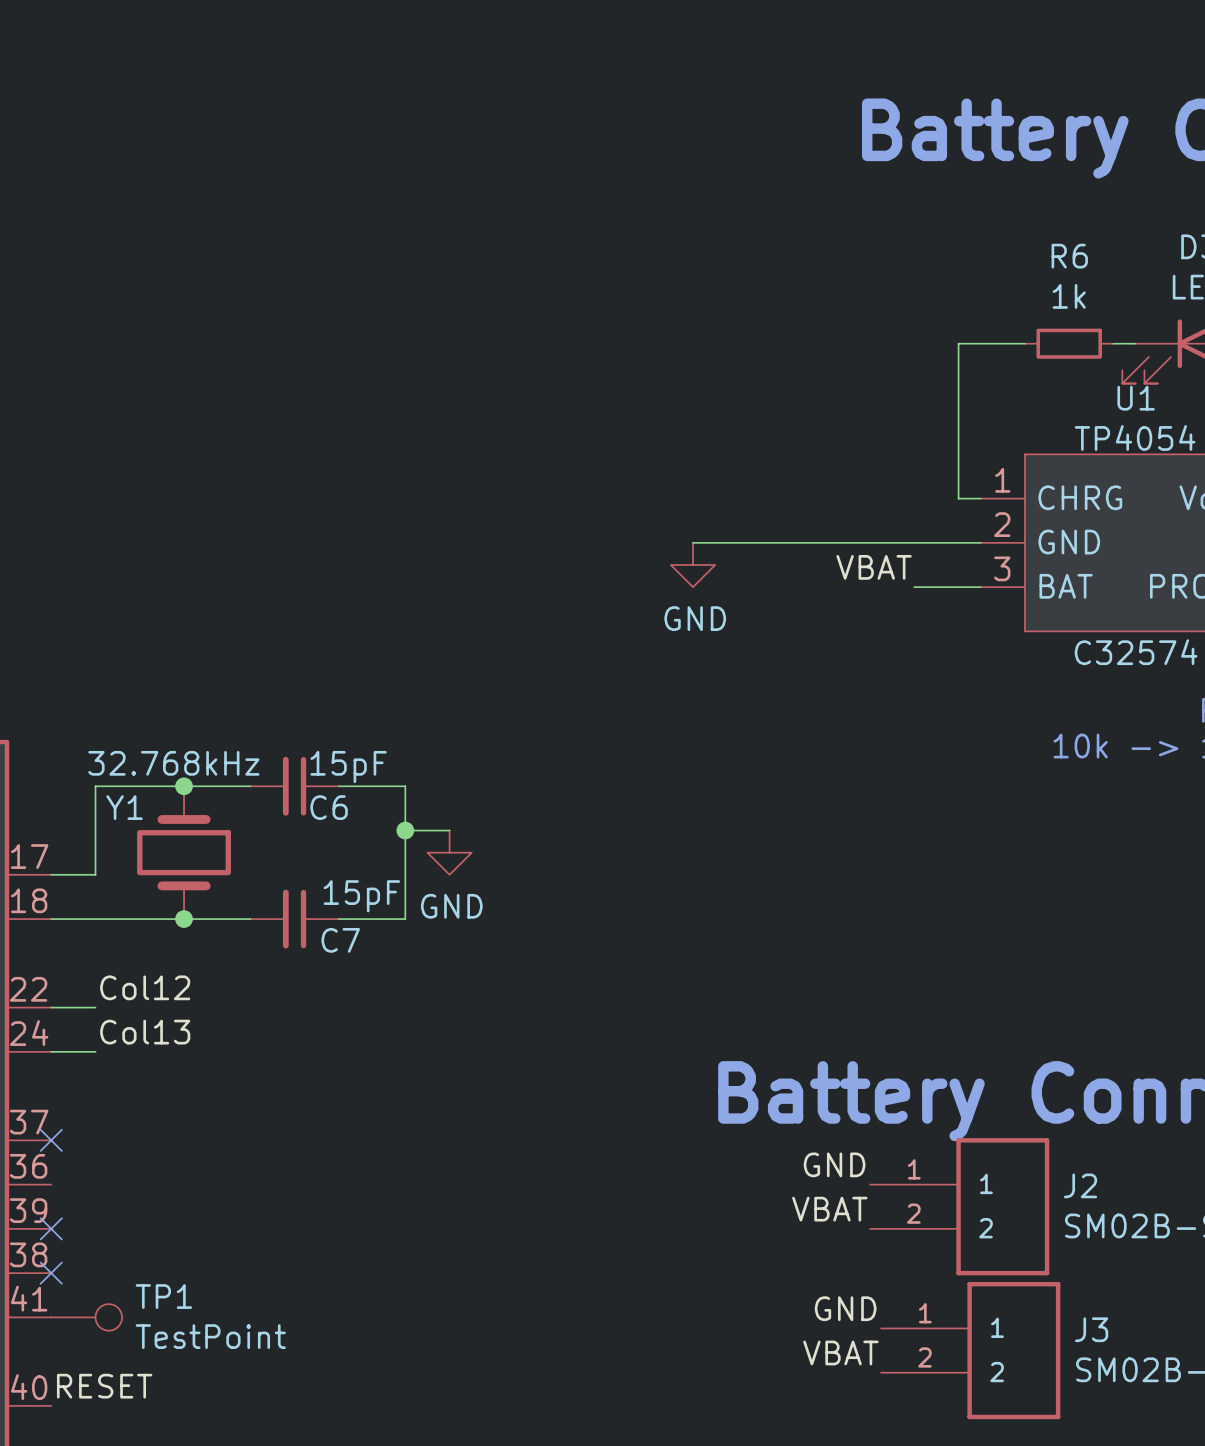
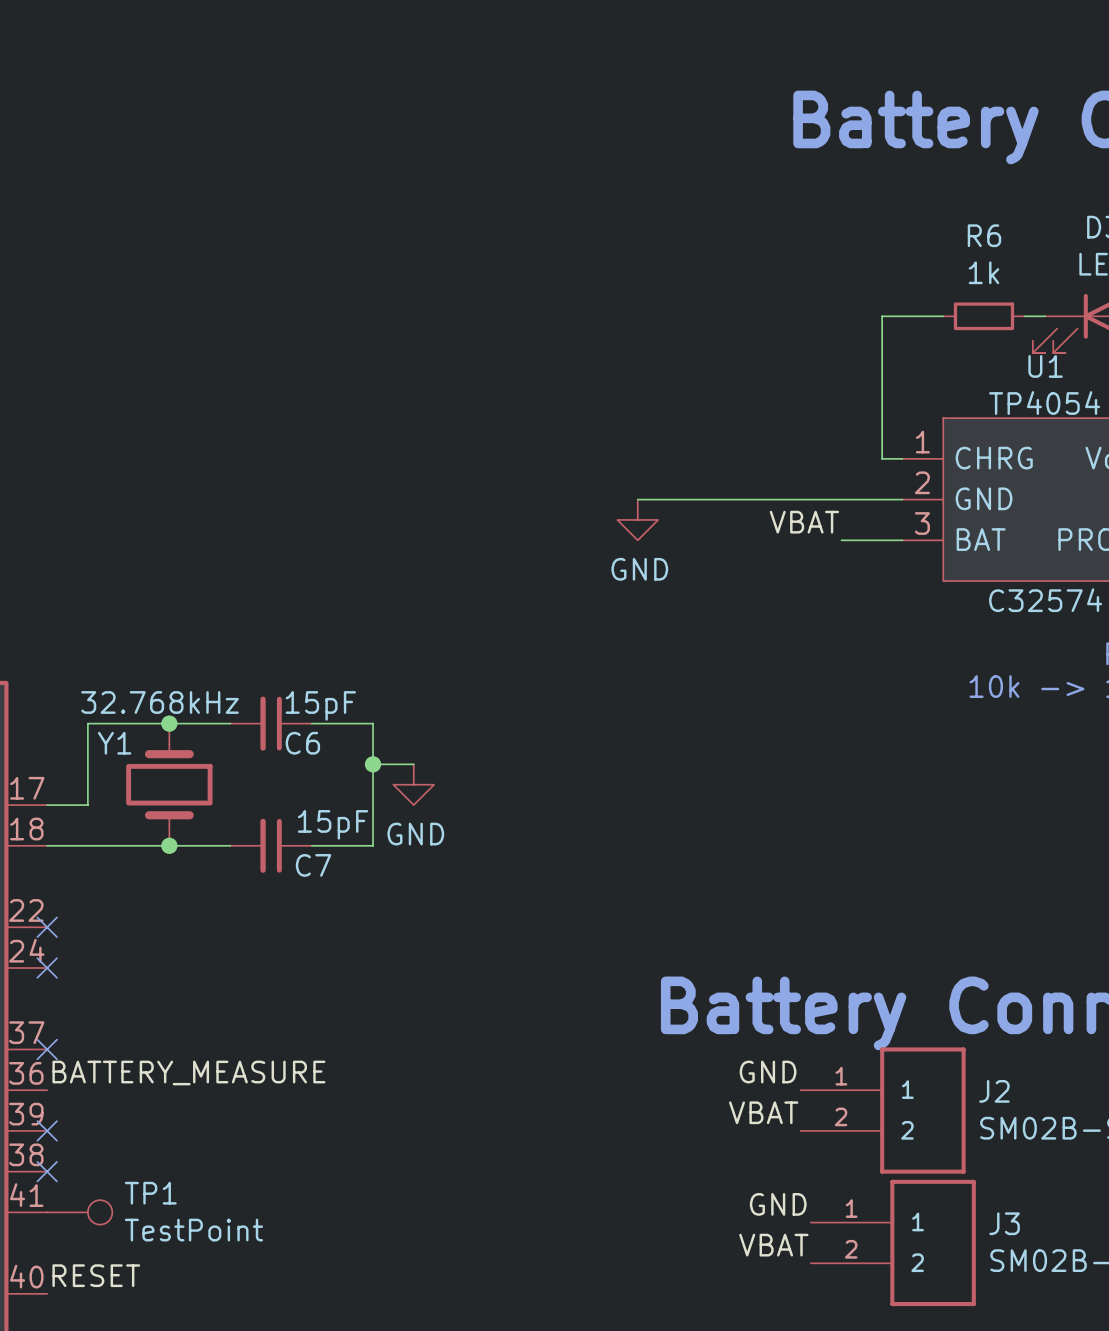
label: Col12 (145, 987) -> none
wire: (51, 1007) (95, 1007) -> none
no-connect mark: none -> (47, 927)
label: Col13 (145, 1032) -> none
wire: (51, 1051) (95, 1051) -> none
no-connect mark: none -> (47, 968)
label: none -> BATTERY_MEASURE (188, 1072)

